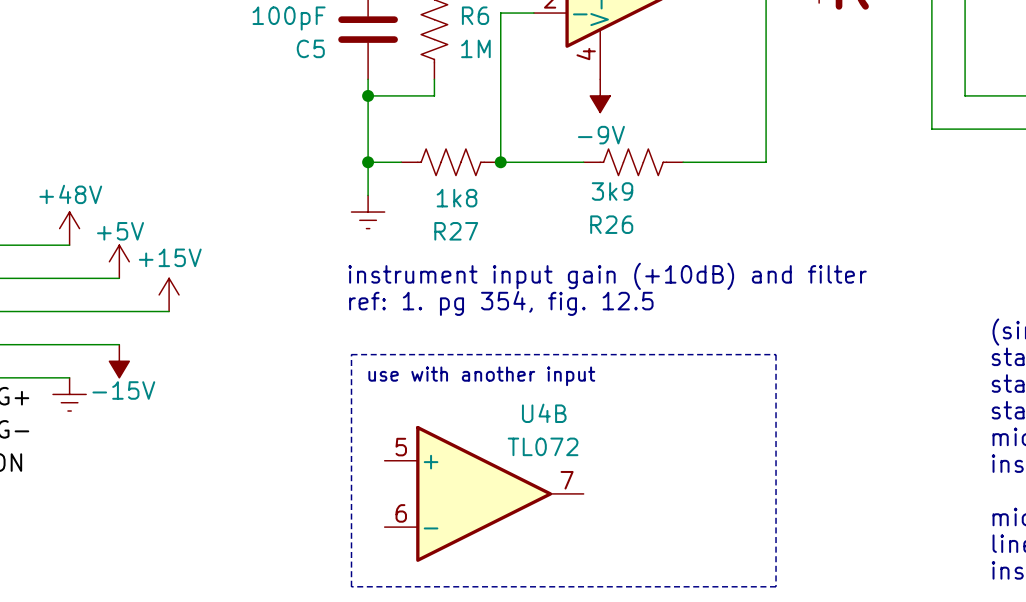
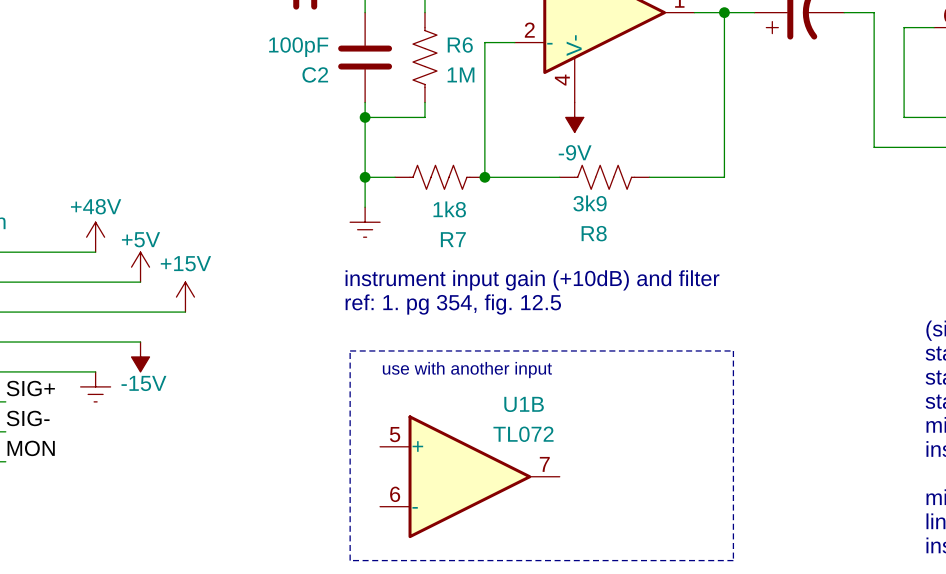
C5 name: C5 (310, 48) -> C2 (315, 74)
R26 name: R26 (611, 224) -> R8 (594, 233)
R27 name: R27 (456, 231) -> R7 (453, 239)
U4B name: U4B (544, 413) -> U1B (524, 404)

